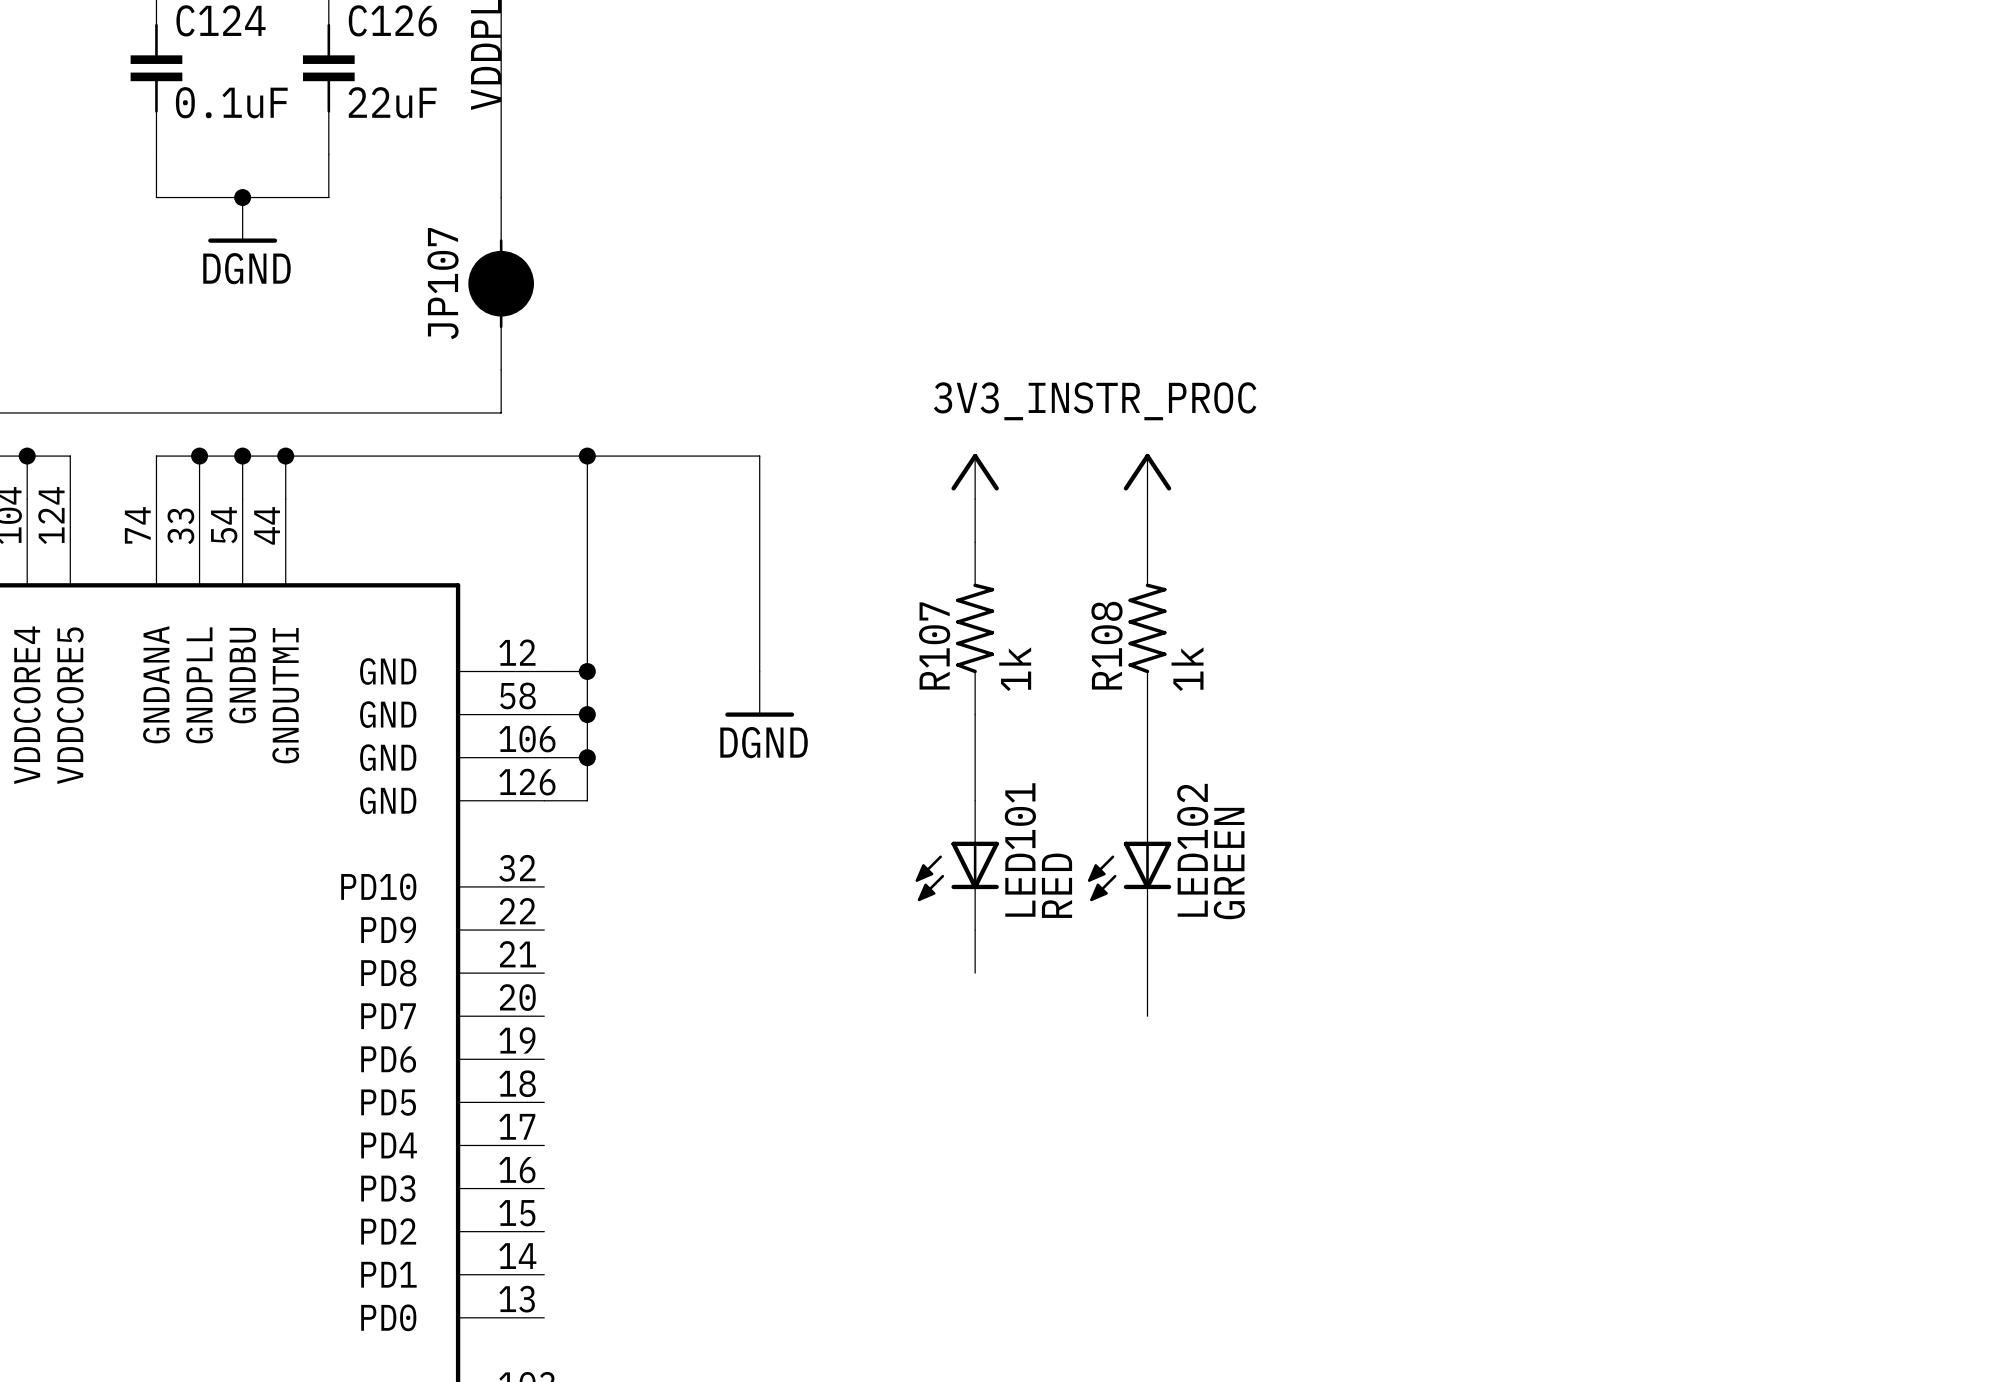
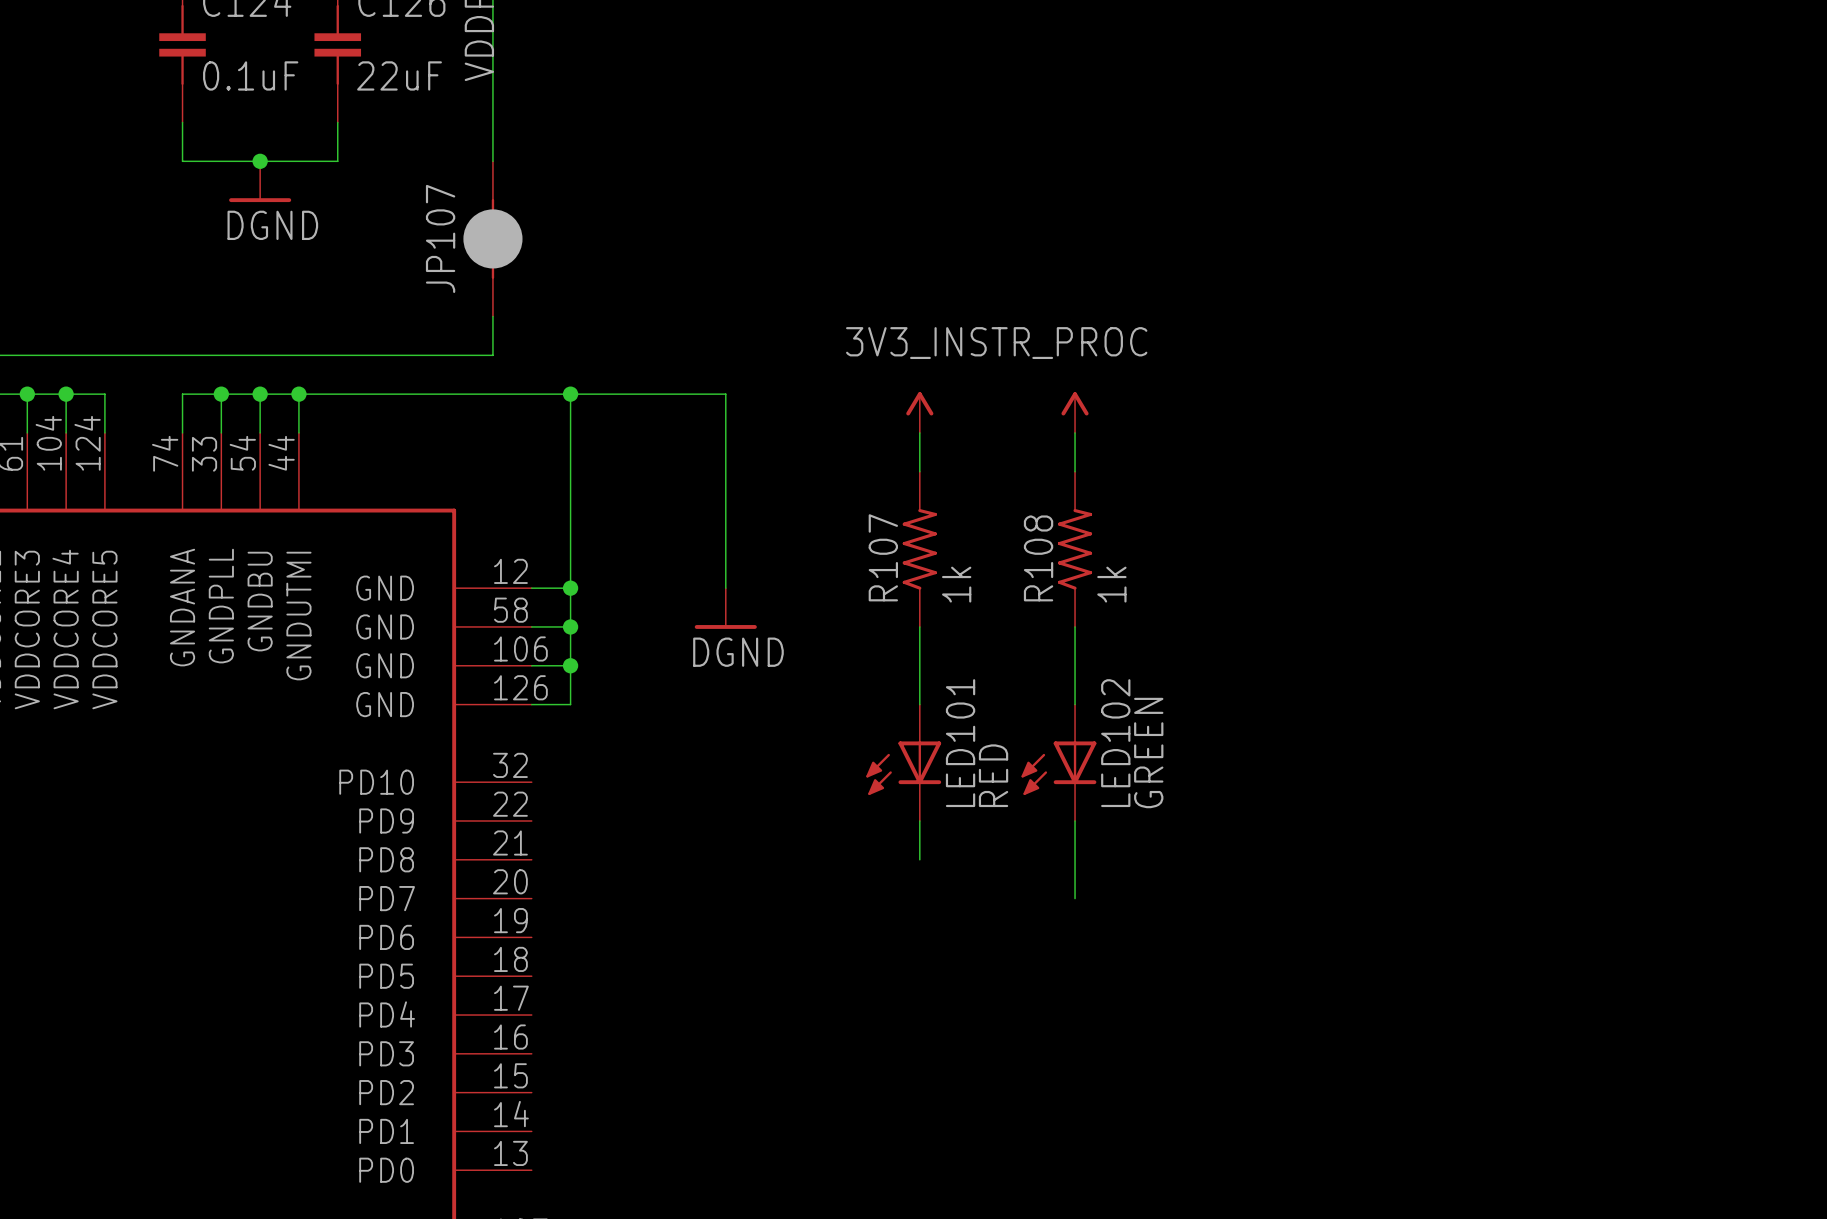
label position: 3V3_INSTR_PROC (1095, 401) -> 3V3_INSTR_PROC (996, 343)
power symbol shape: [951, 453, 999, 500] -> [906, 392, 934, 433]
power symbol shape: [1123, 453, 1172, 500] -> [1061, 392, 1089, 433]

